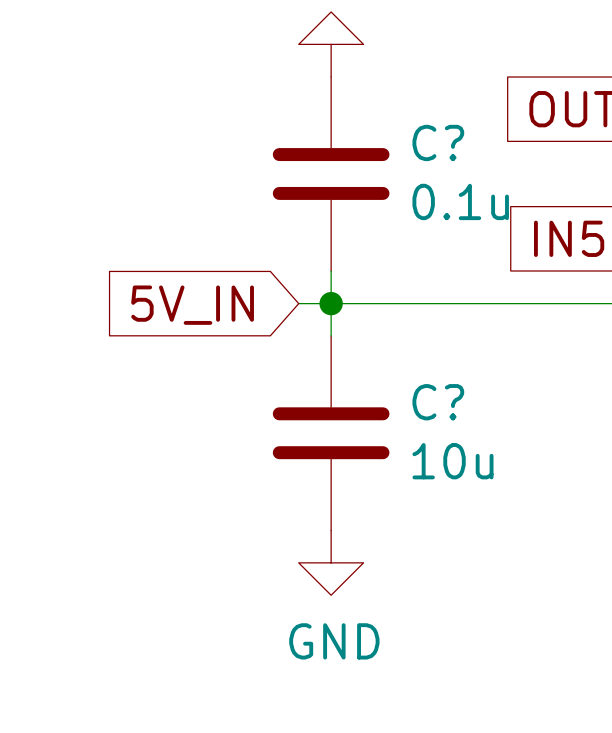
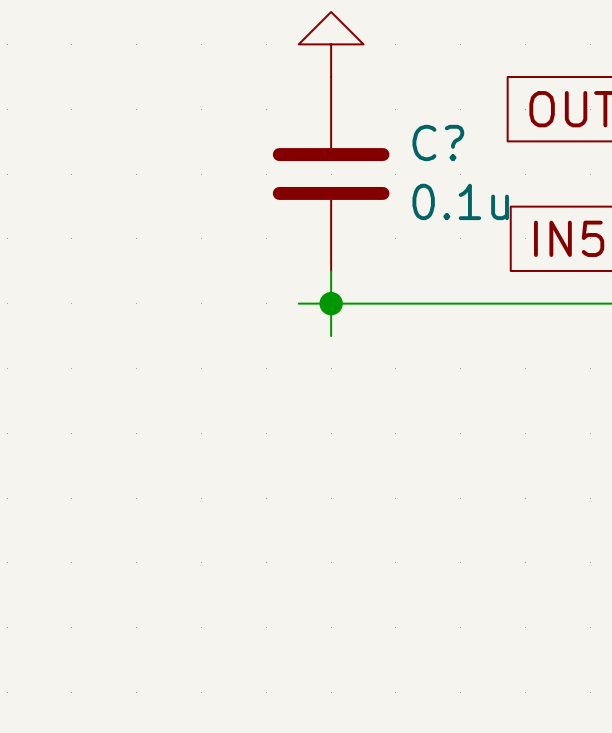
global label: 5V_IN (192, 305) -> none
C?: 10u (331, 433) -> none
power symbol: GND (331, 562) -> none

